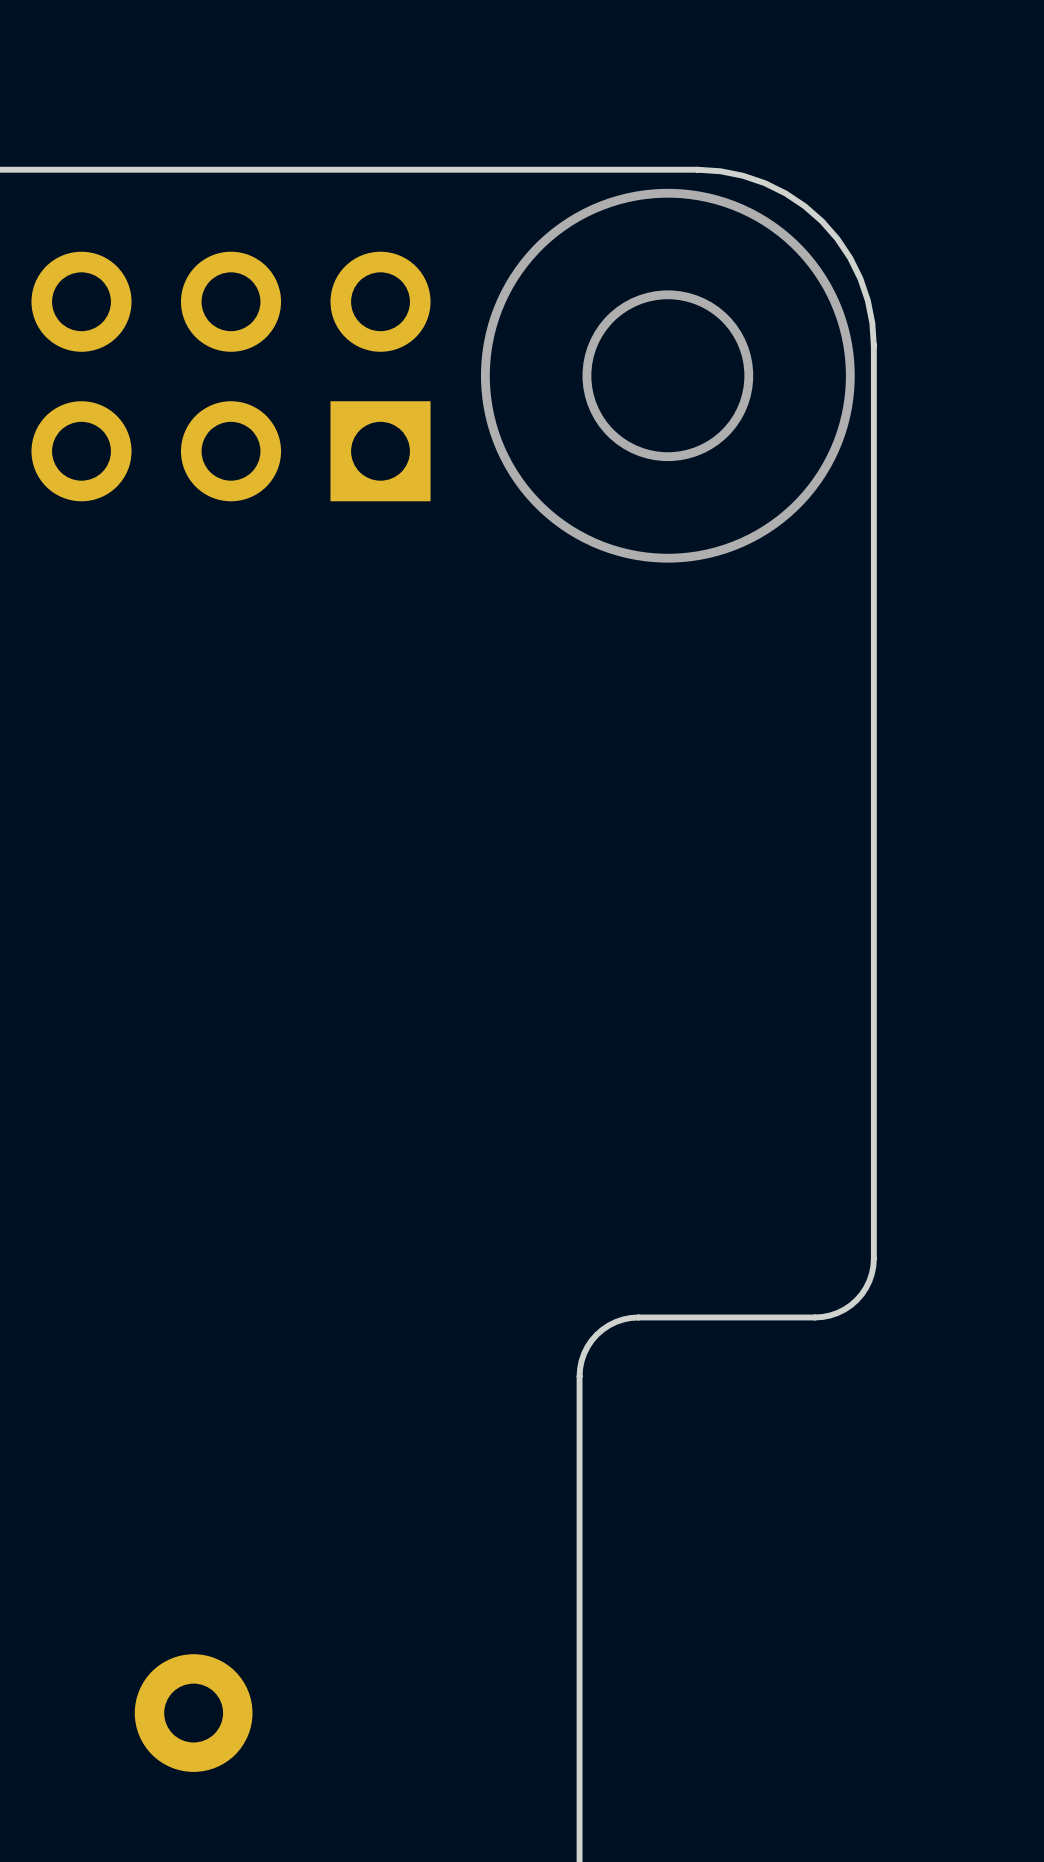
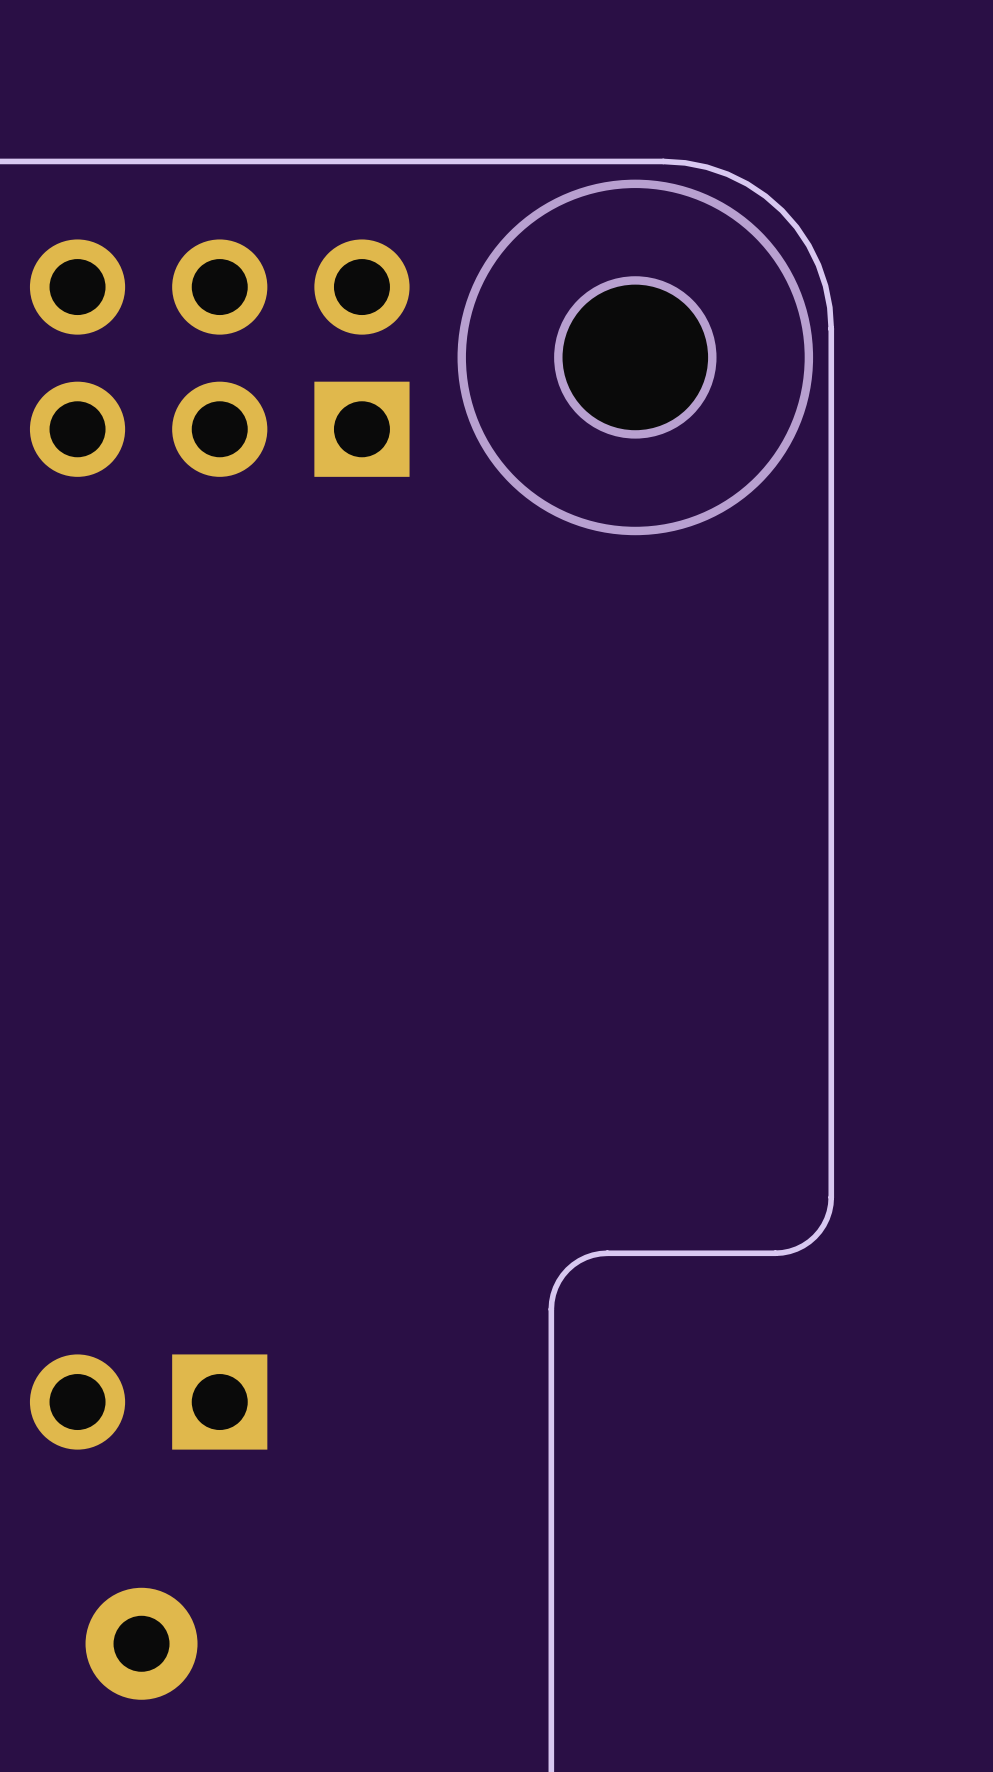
part: none -> (148, 1402)
part position: (193, 1713) -> (141, 1643)

